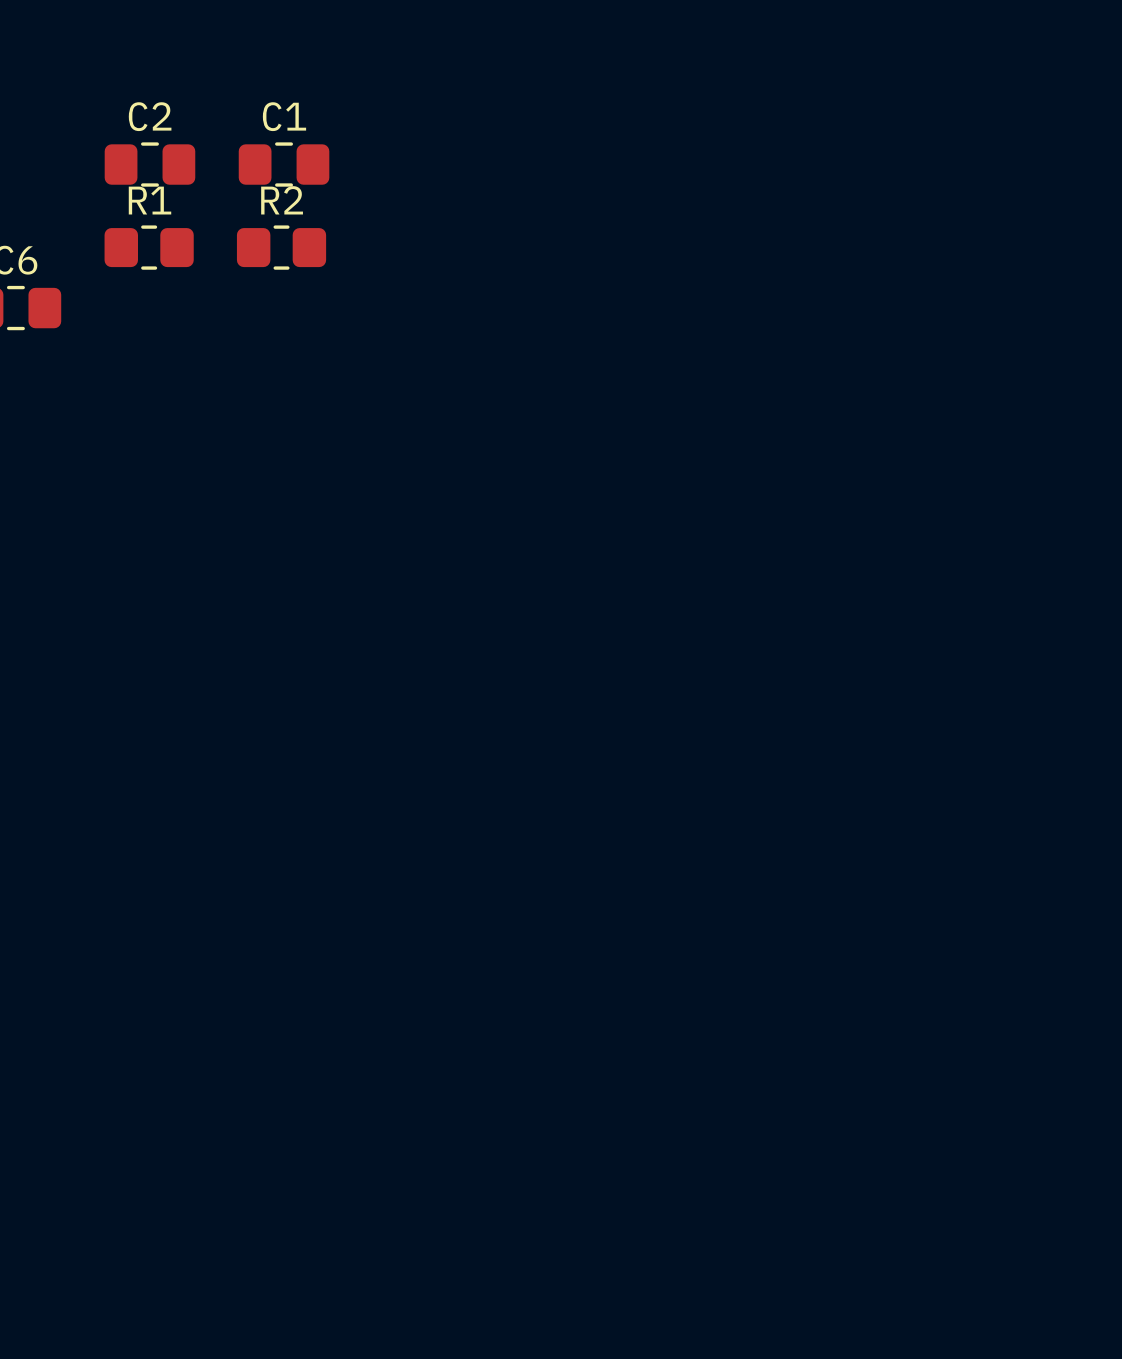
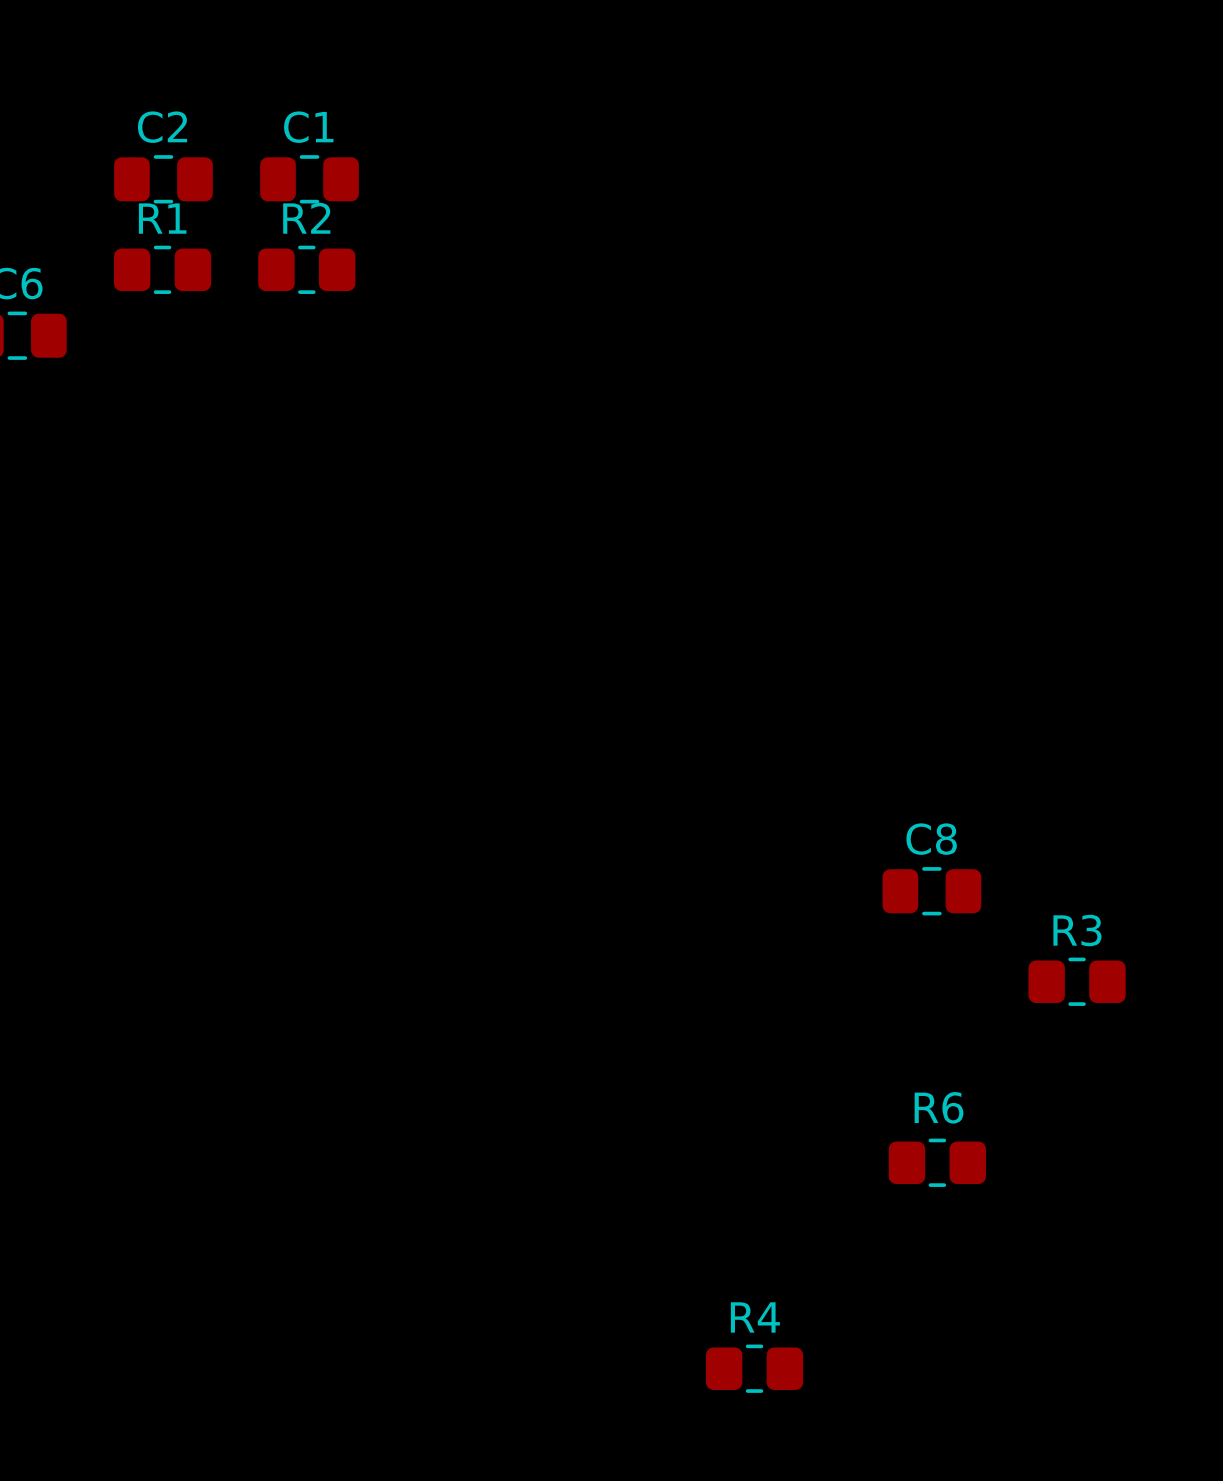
C8: none -> (931, 891)
R3: none -> (1077, 981)
R6: none -> (937, 1162)
R4: none -> (754, 1368)

